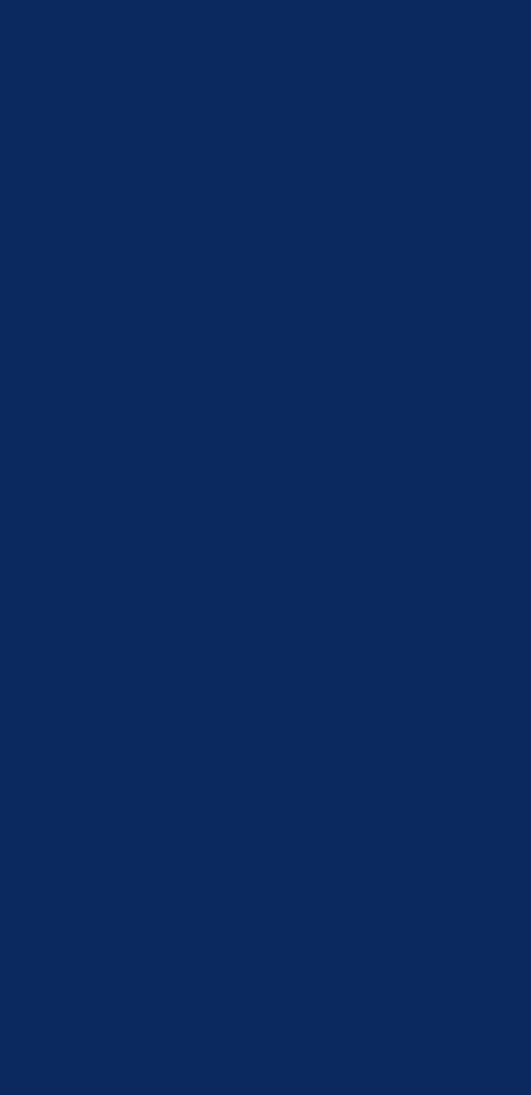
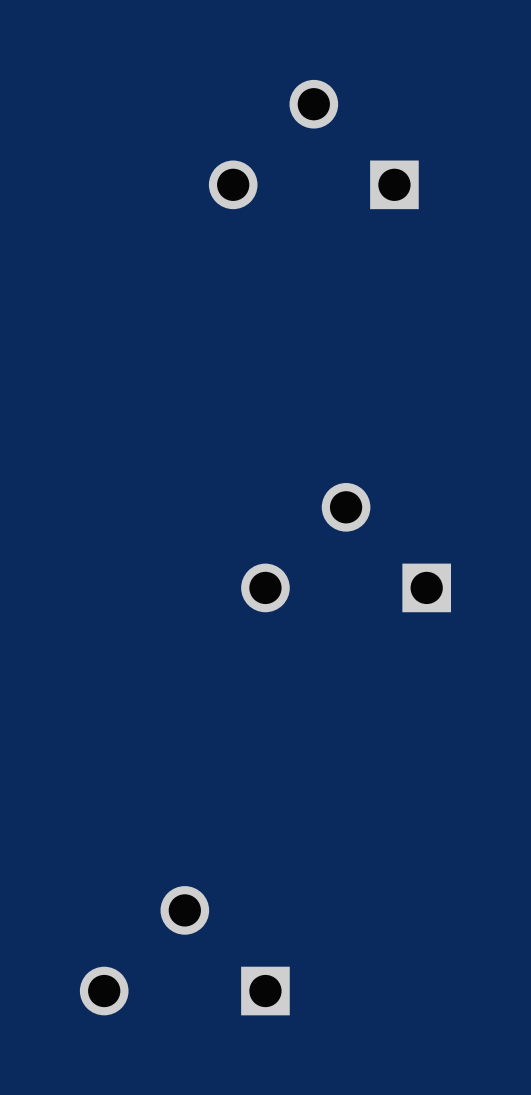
part: none -> (313, 144)
part: none -> (346, 547)
part: none -> (184, 950)

